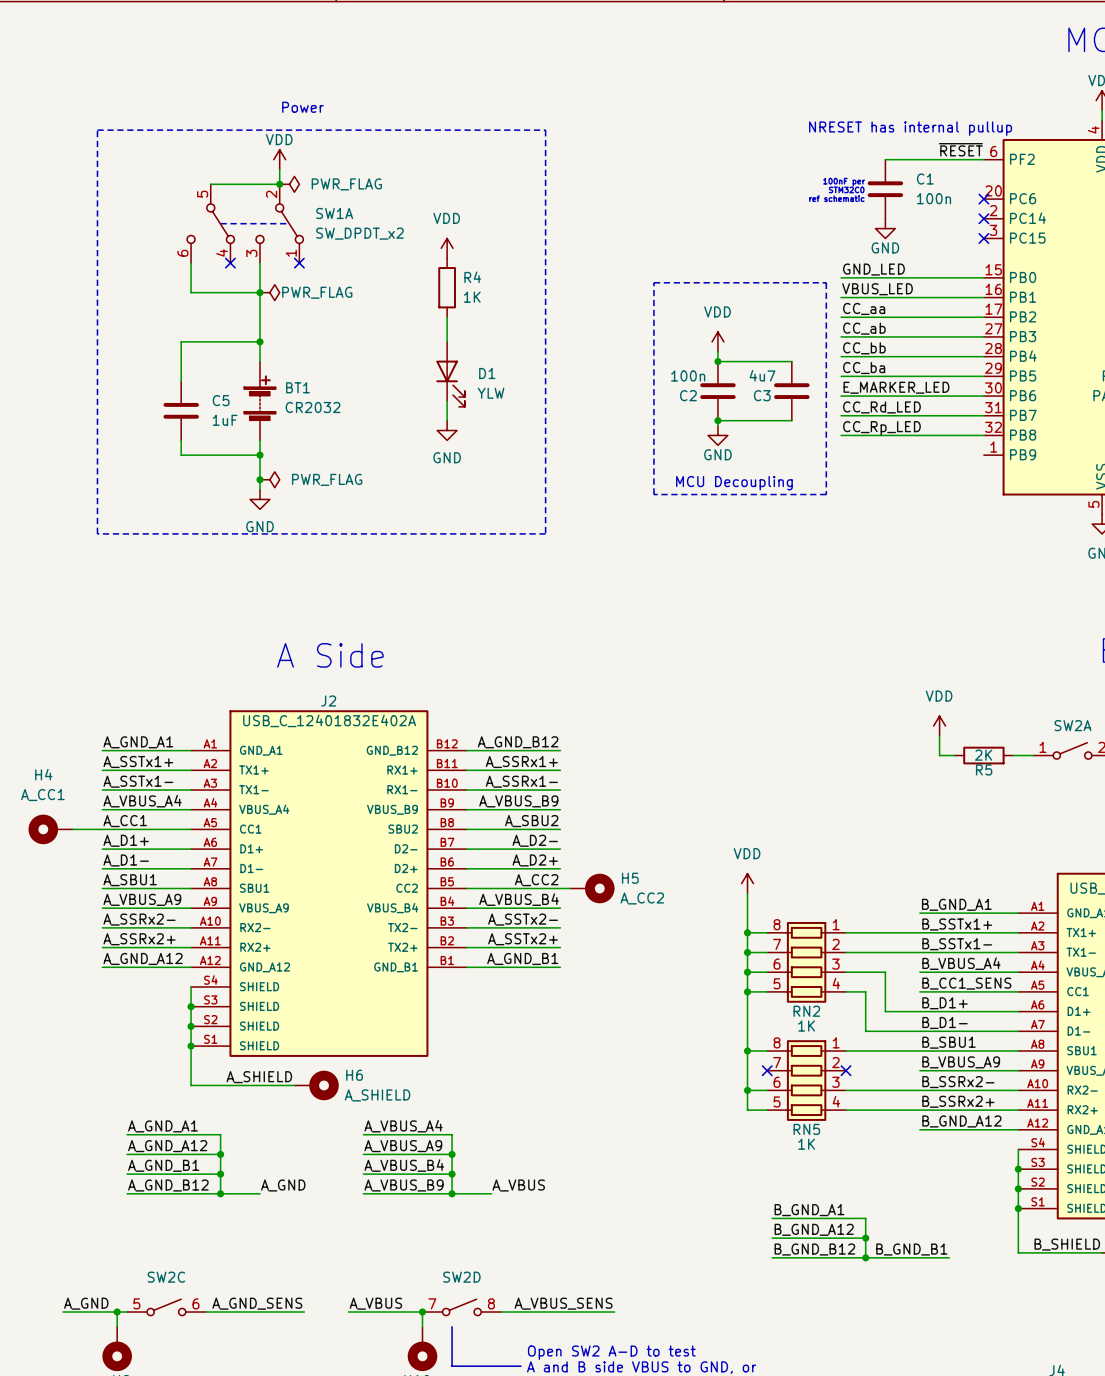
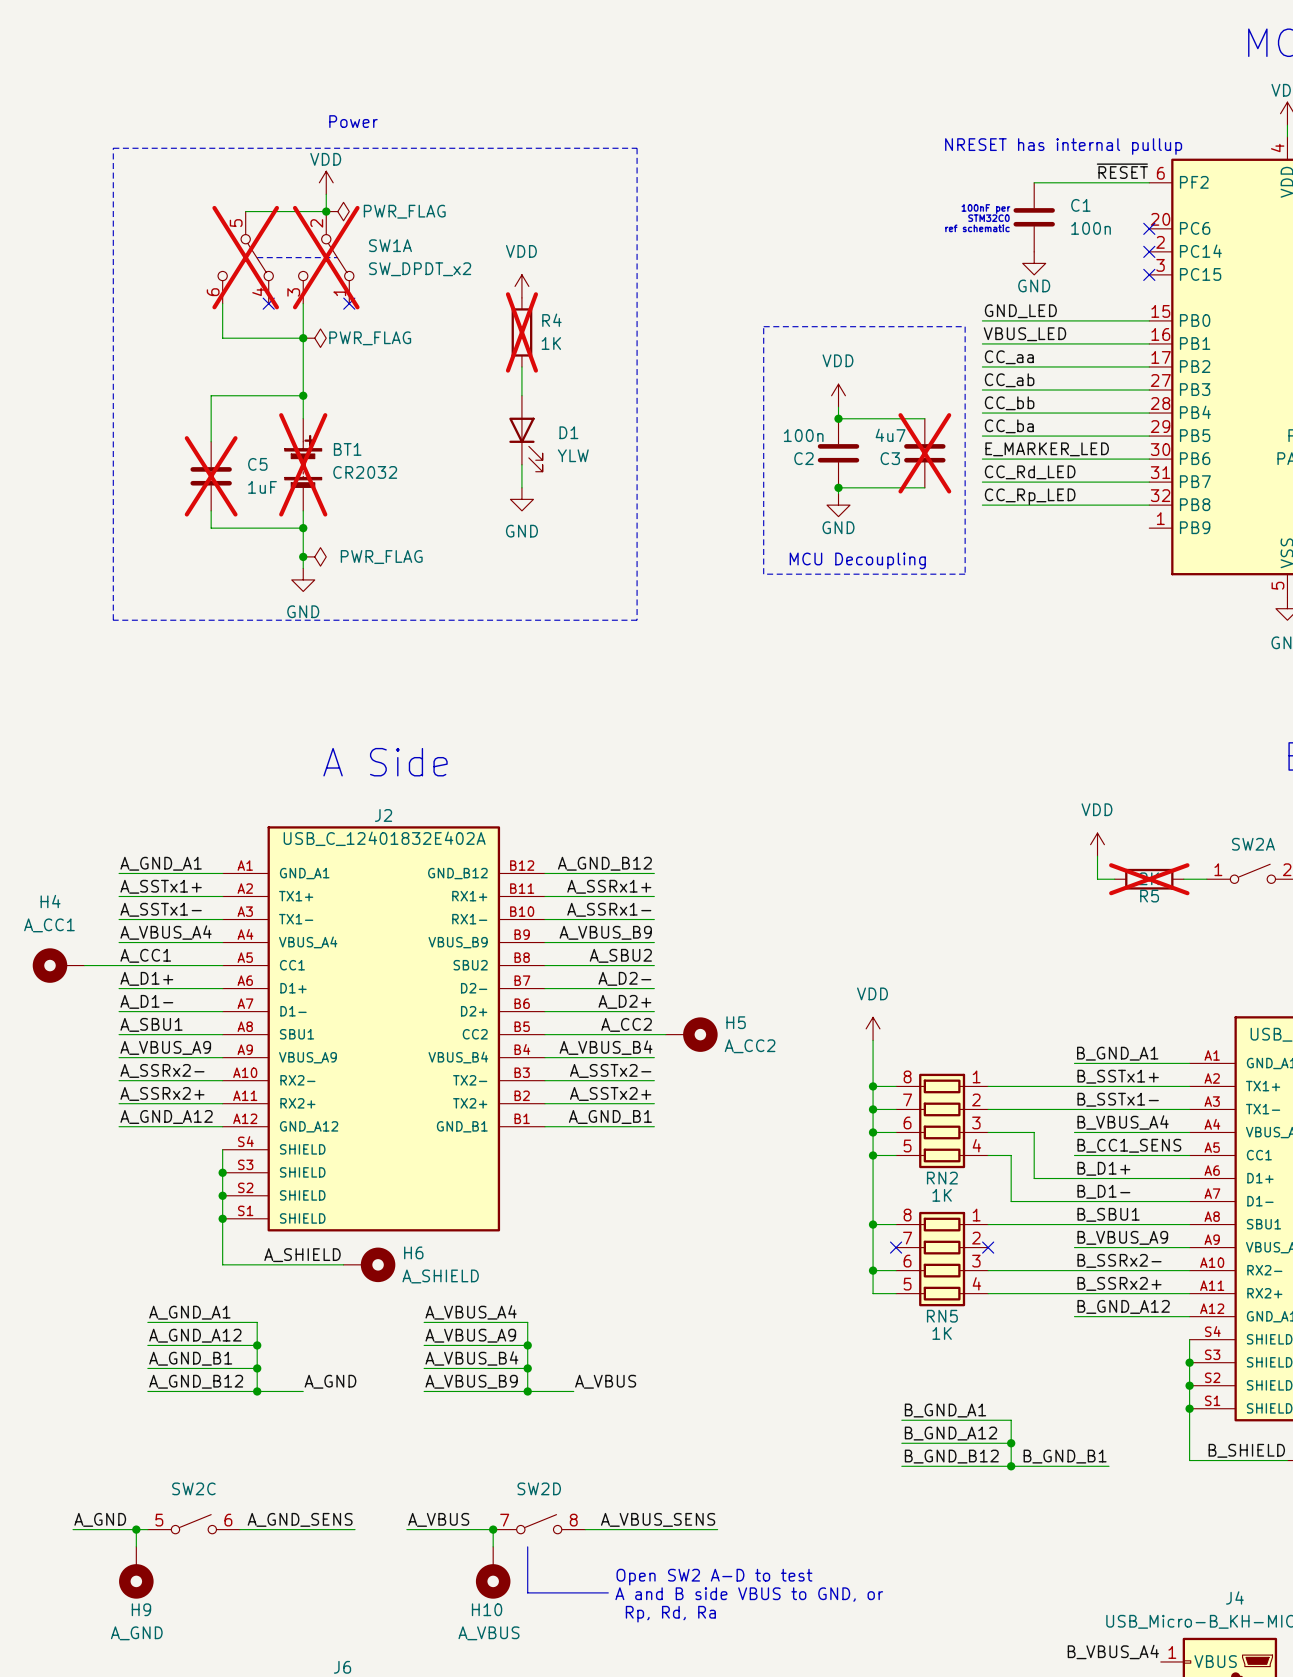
part do-not-place cross: none -> (245, 257)
SW1A do-not-place cross: none -> (326, 257)
R4 do-not-place cross: none -> (521, 332)
C3 do-not-place cross: none -> (924, 453)
BT1 do-not-place cross: none -> (303, 464)
C5 do-not-place cross: none -> (211, 476)
R5 do-not-place cross: none -> (1149, 879)

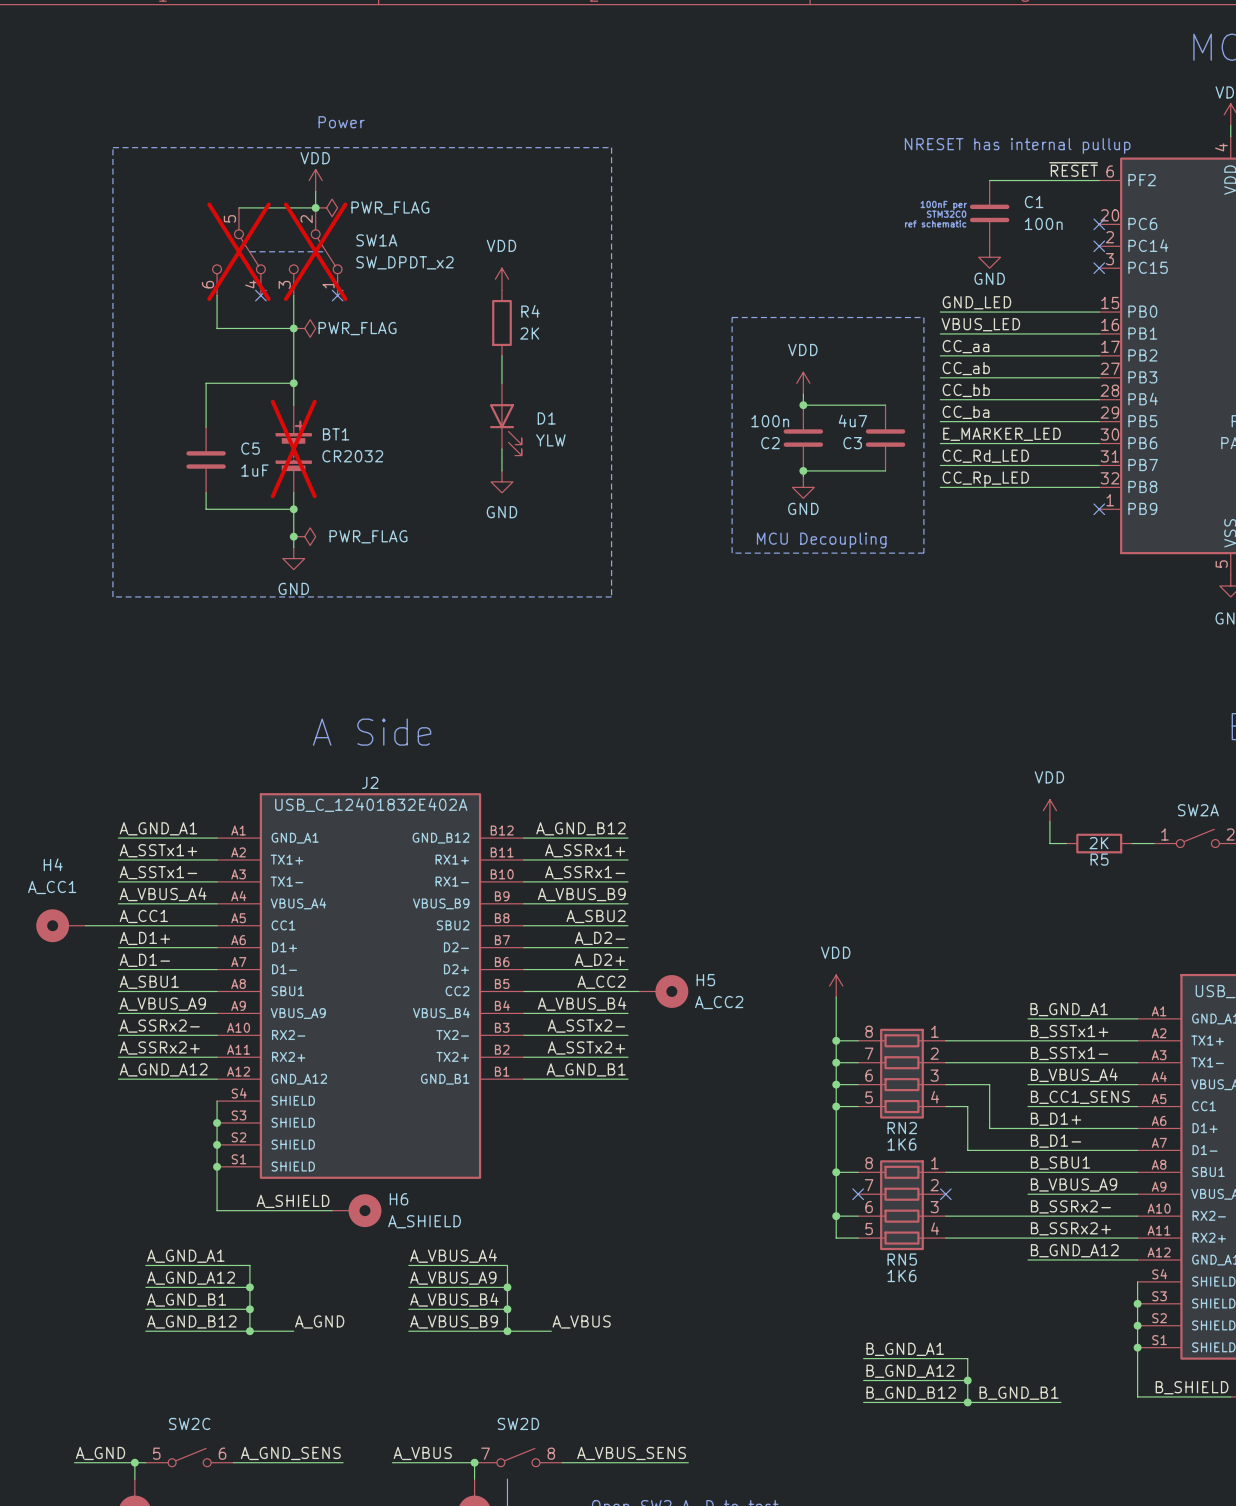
R4 do-not-place cross: (521, 332) -> none
R4 value: 1K (551, 343) -> 2K (529, 333)
C3 do-not-place cross: (924, 453) -> none
C5 do-not-place cross: (211, 476) -> none
no-connect mark: none -> (1099, 509)
R5 do-not-place cross: (1149, 879) -> none
RN2 value: 1K (942, 1195) -> 1K6 (901, 1144)
RN5 value: 1K (942, 1333) -> 1K6 (901, 1276)

